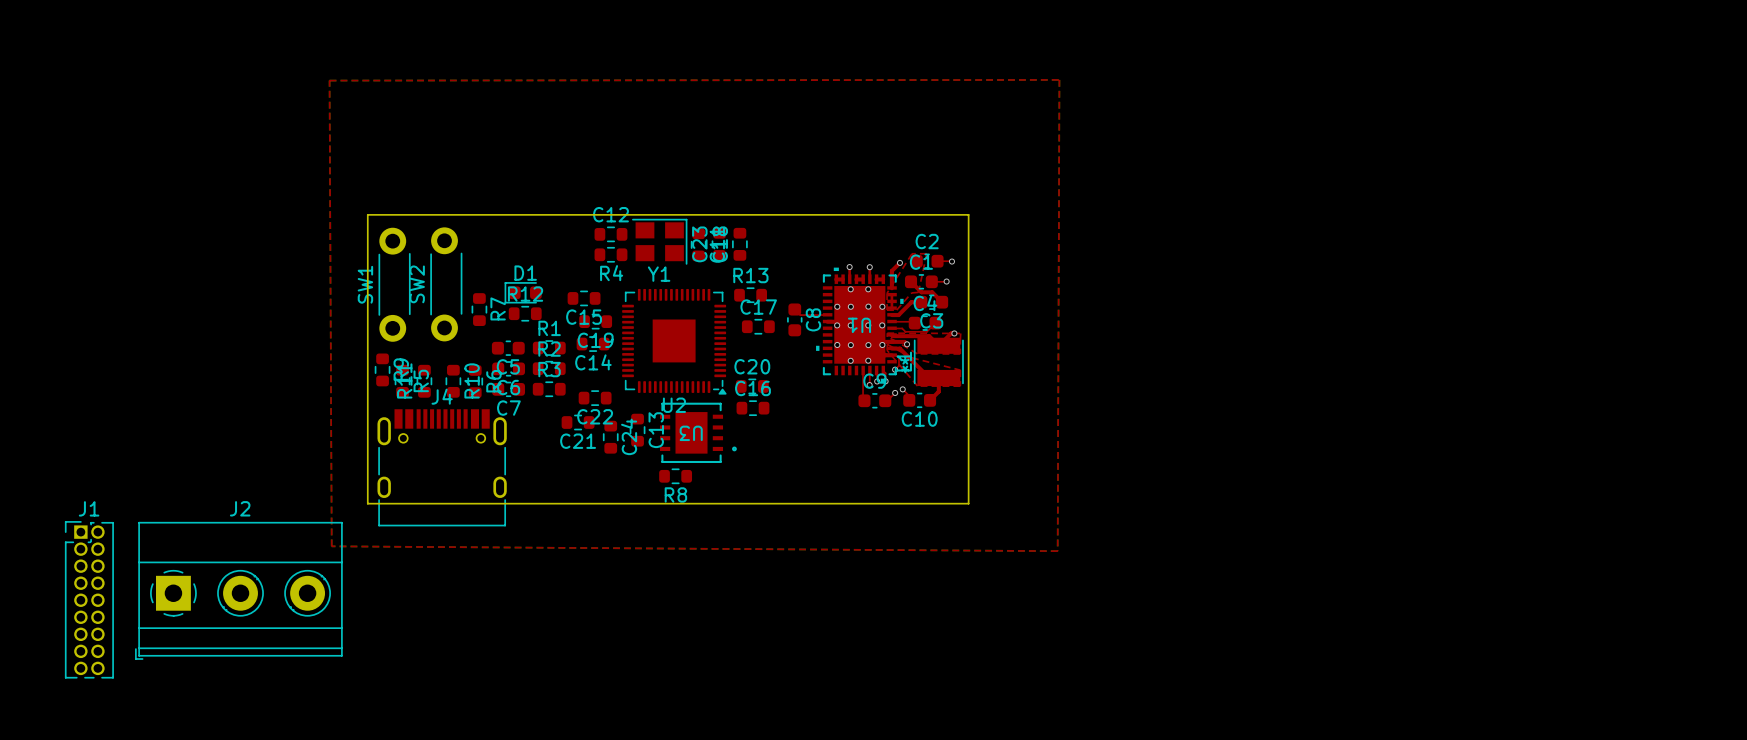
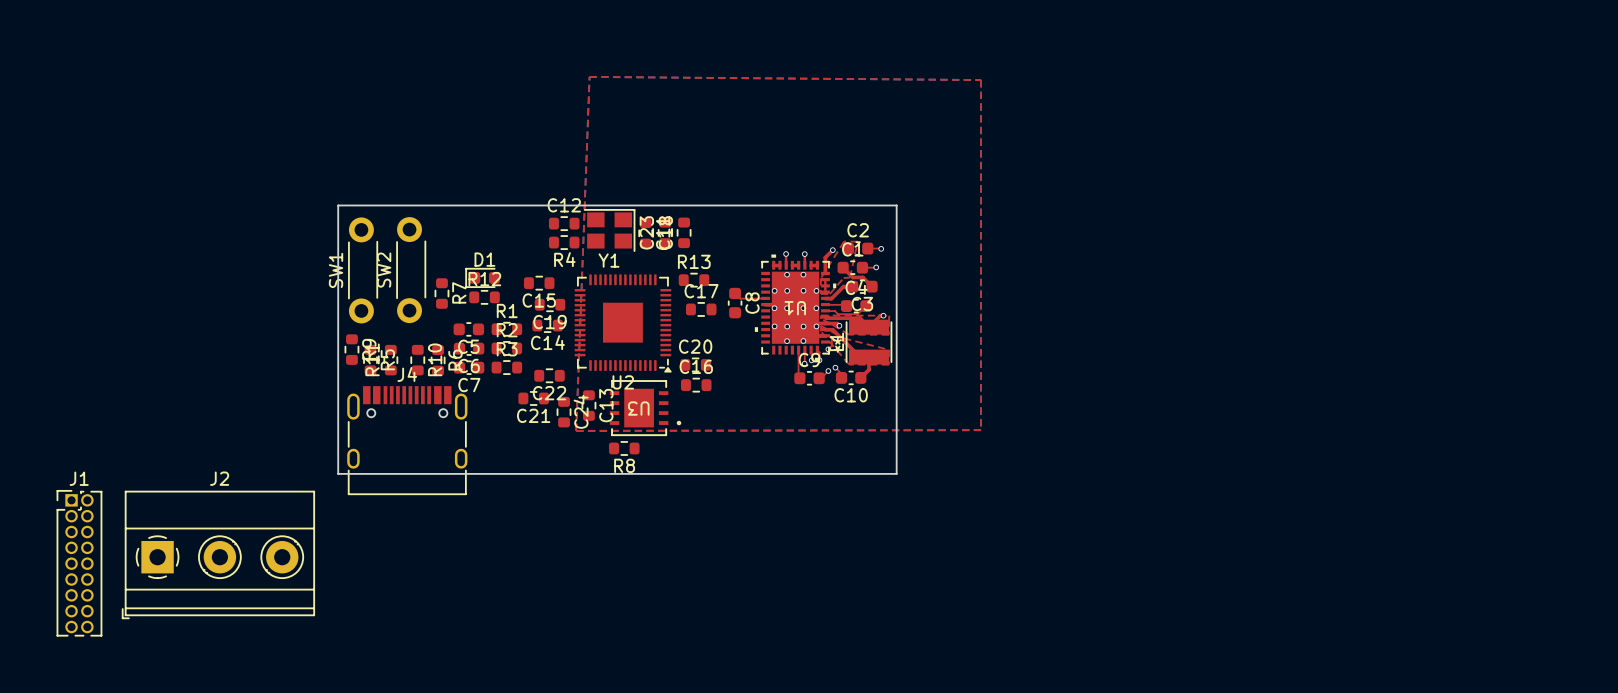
top zone outline: none -> (589, 76) (981, 80) (981, 430) (576, 430) (589, 76)
top zone outline: (1059, 79) (329, 80) (331, 546) (1057, 551) (1059, 79) -> none

